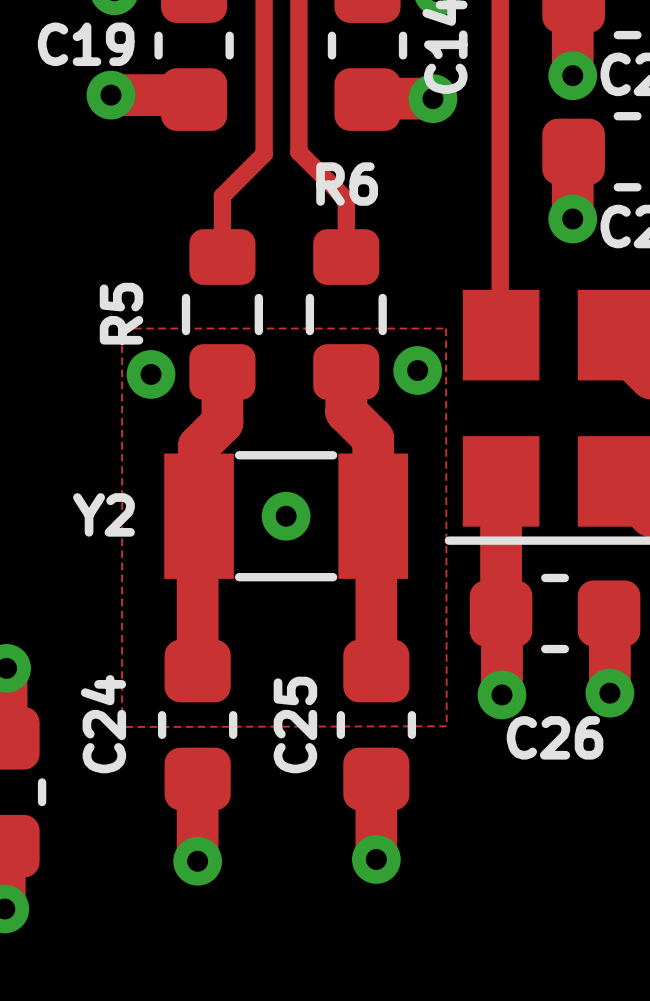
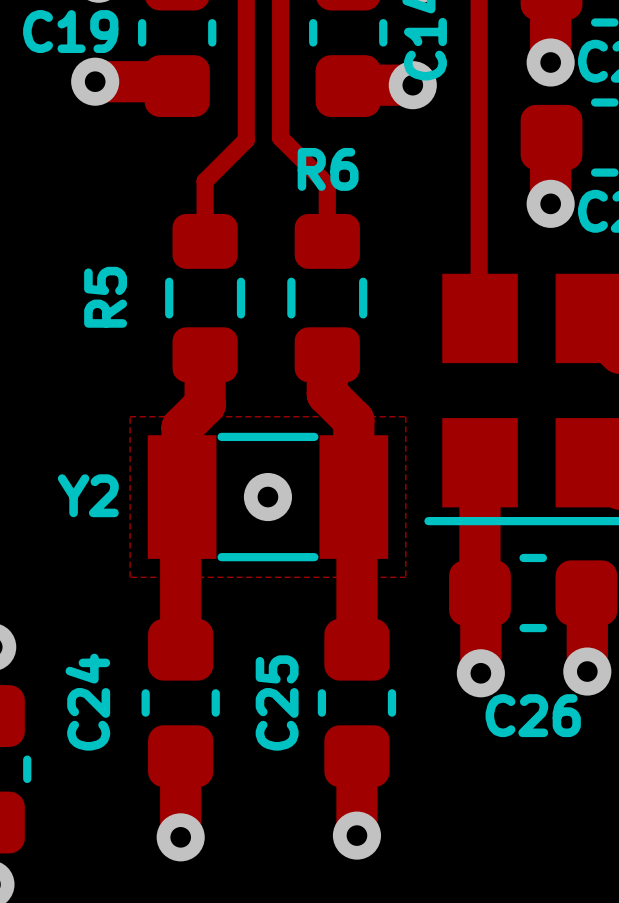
zone outline: (122, 328) (122, 726) (446, 726) (446, 328) (122, 328) -> none
via: (417, 370) -> none
via: (151, 374) -> none
zone outline: none -> (130, 416) (130, 577) (405, 577) (405, 416) (130, 416)

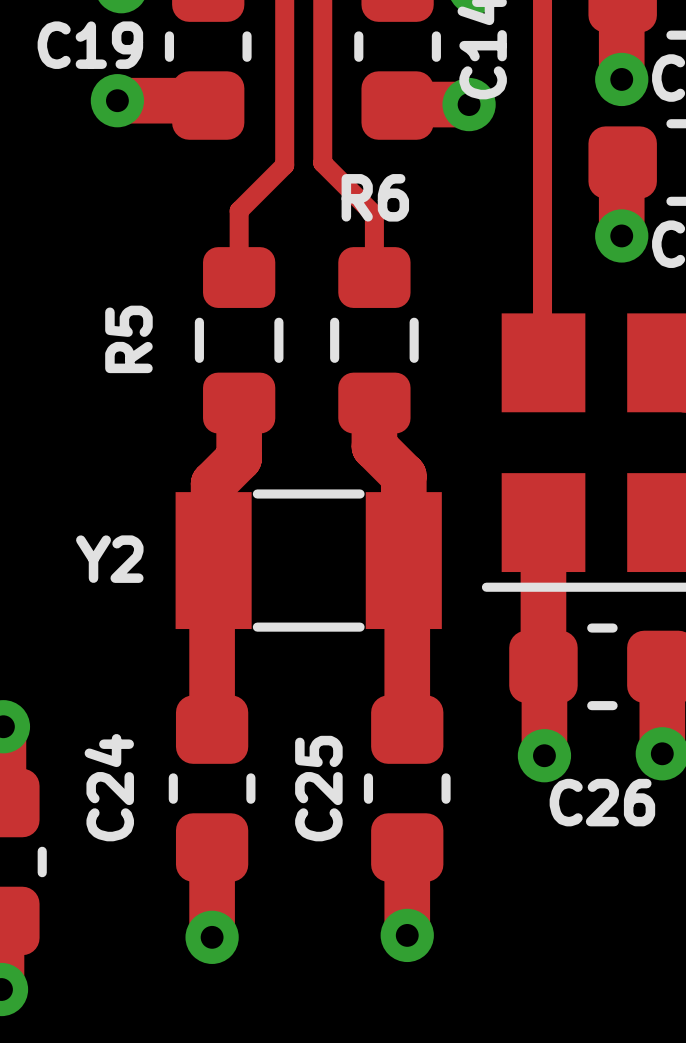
zone outline: (130, 416) (130, 577) (405, 577) (405, 416) (130, 416) -> none
via: (267, 497) -> none

